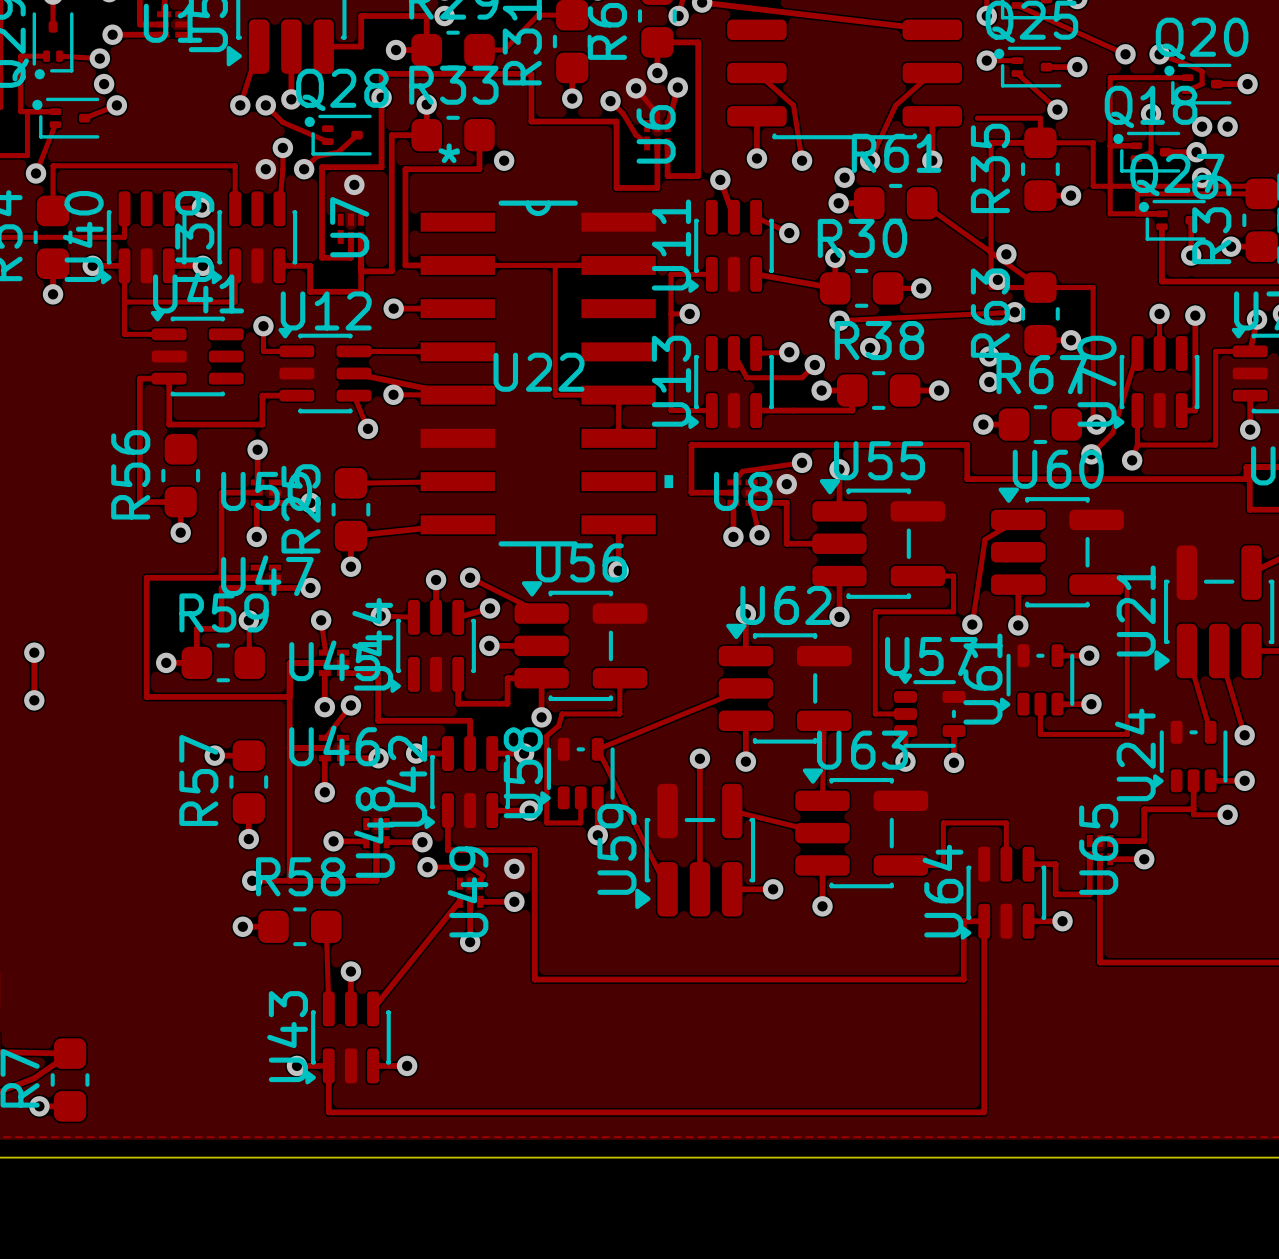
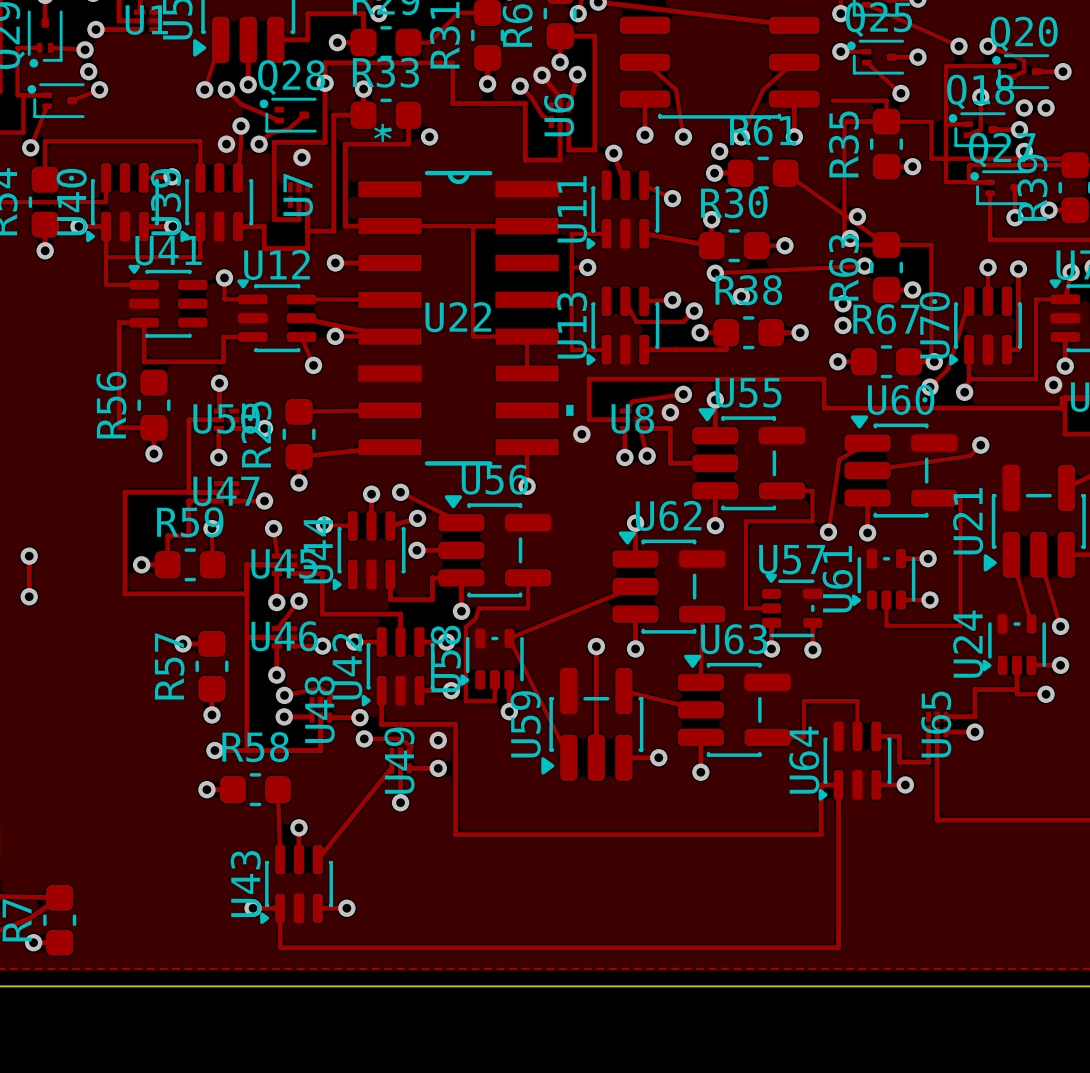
via: none -> (1053, 384)
via: none -> (581, 434)
track: none -> (980, 445) (969, 456) (867, 470)
via: none -> (980, 445)
track: none -> (284, 695) (320, 688) (331, 695) (329, 702)
via: none -> (284, 695)

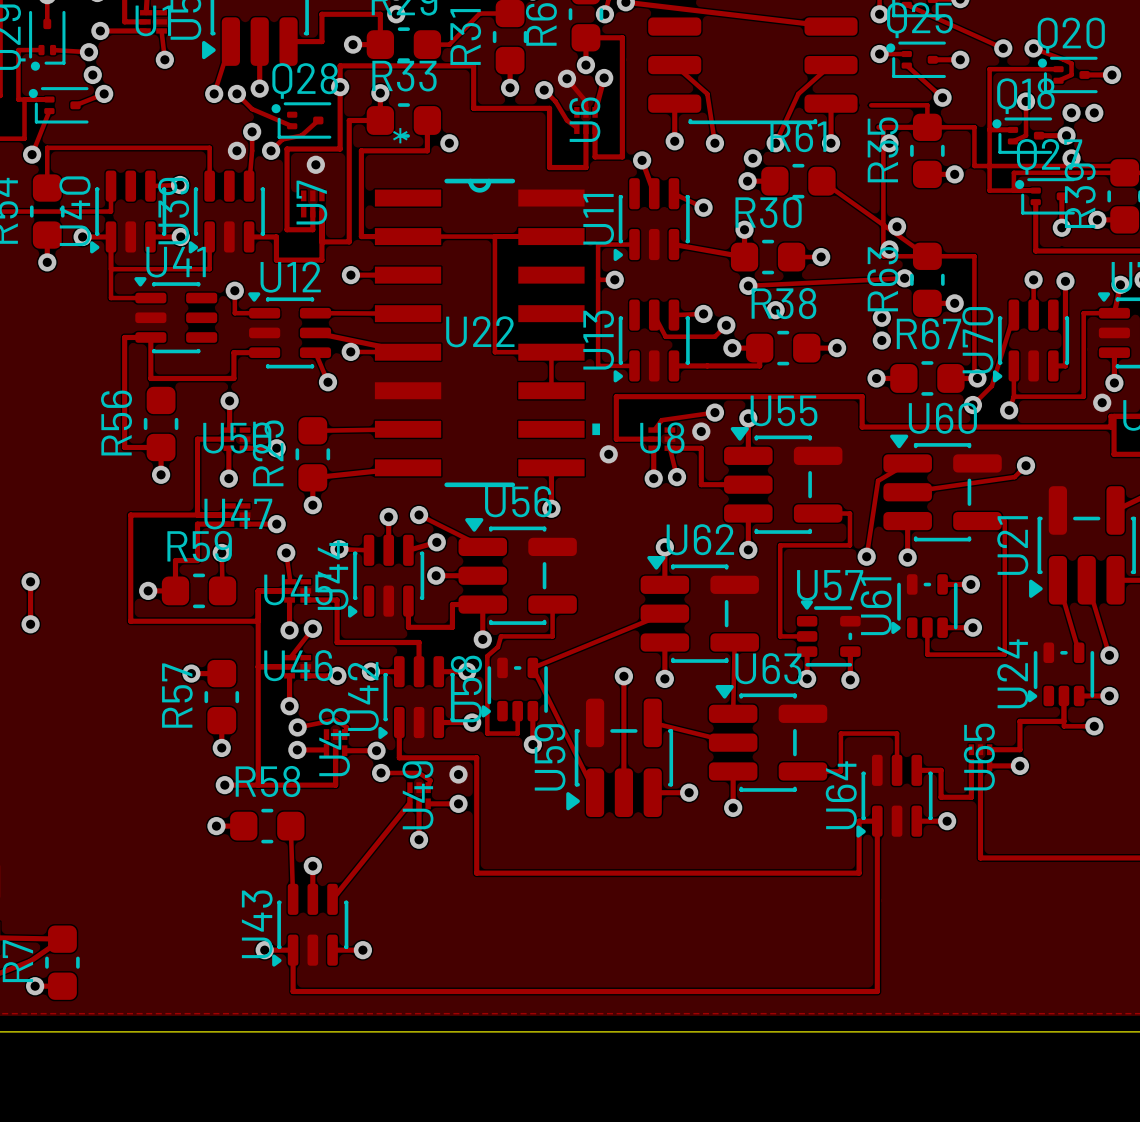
track: none -> (161, 30) (164, 59)
via: none -> (164, 59)
via: none -> (889, 143)

